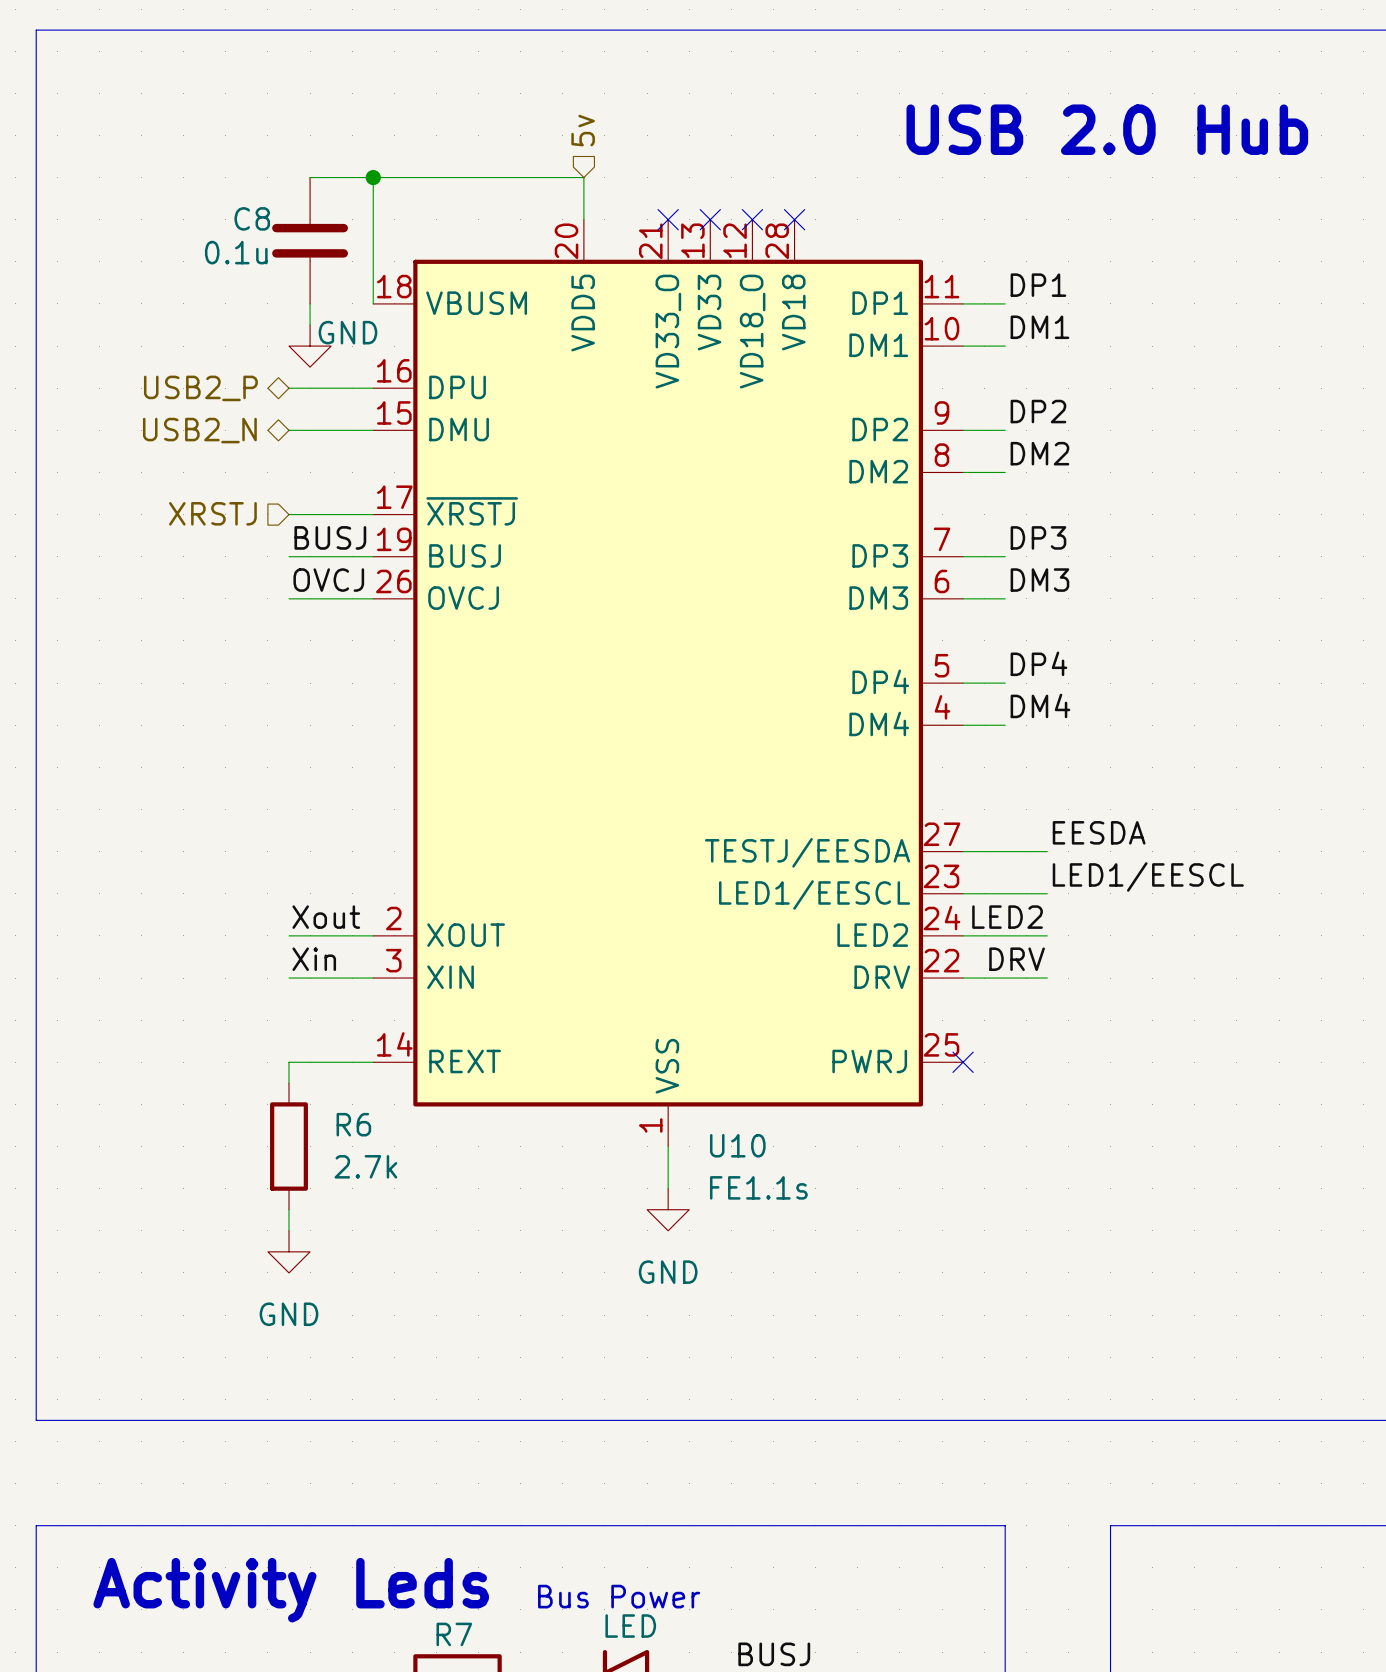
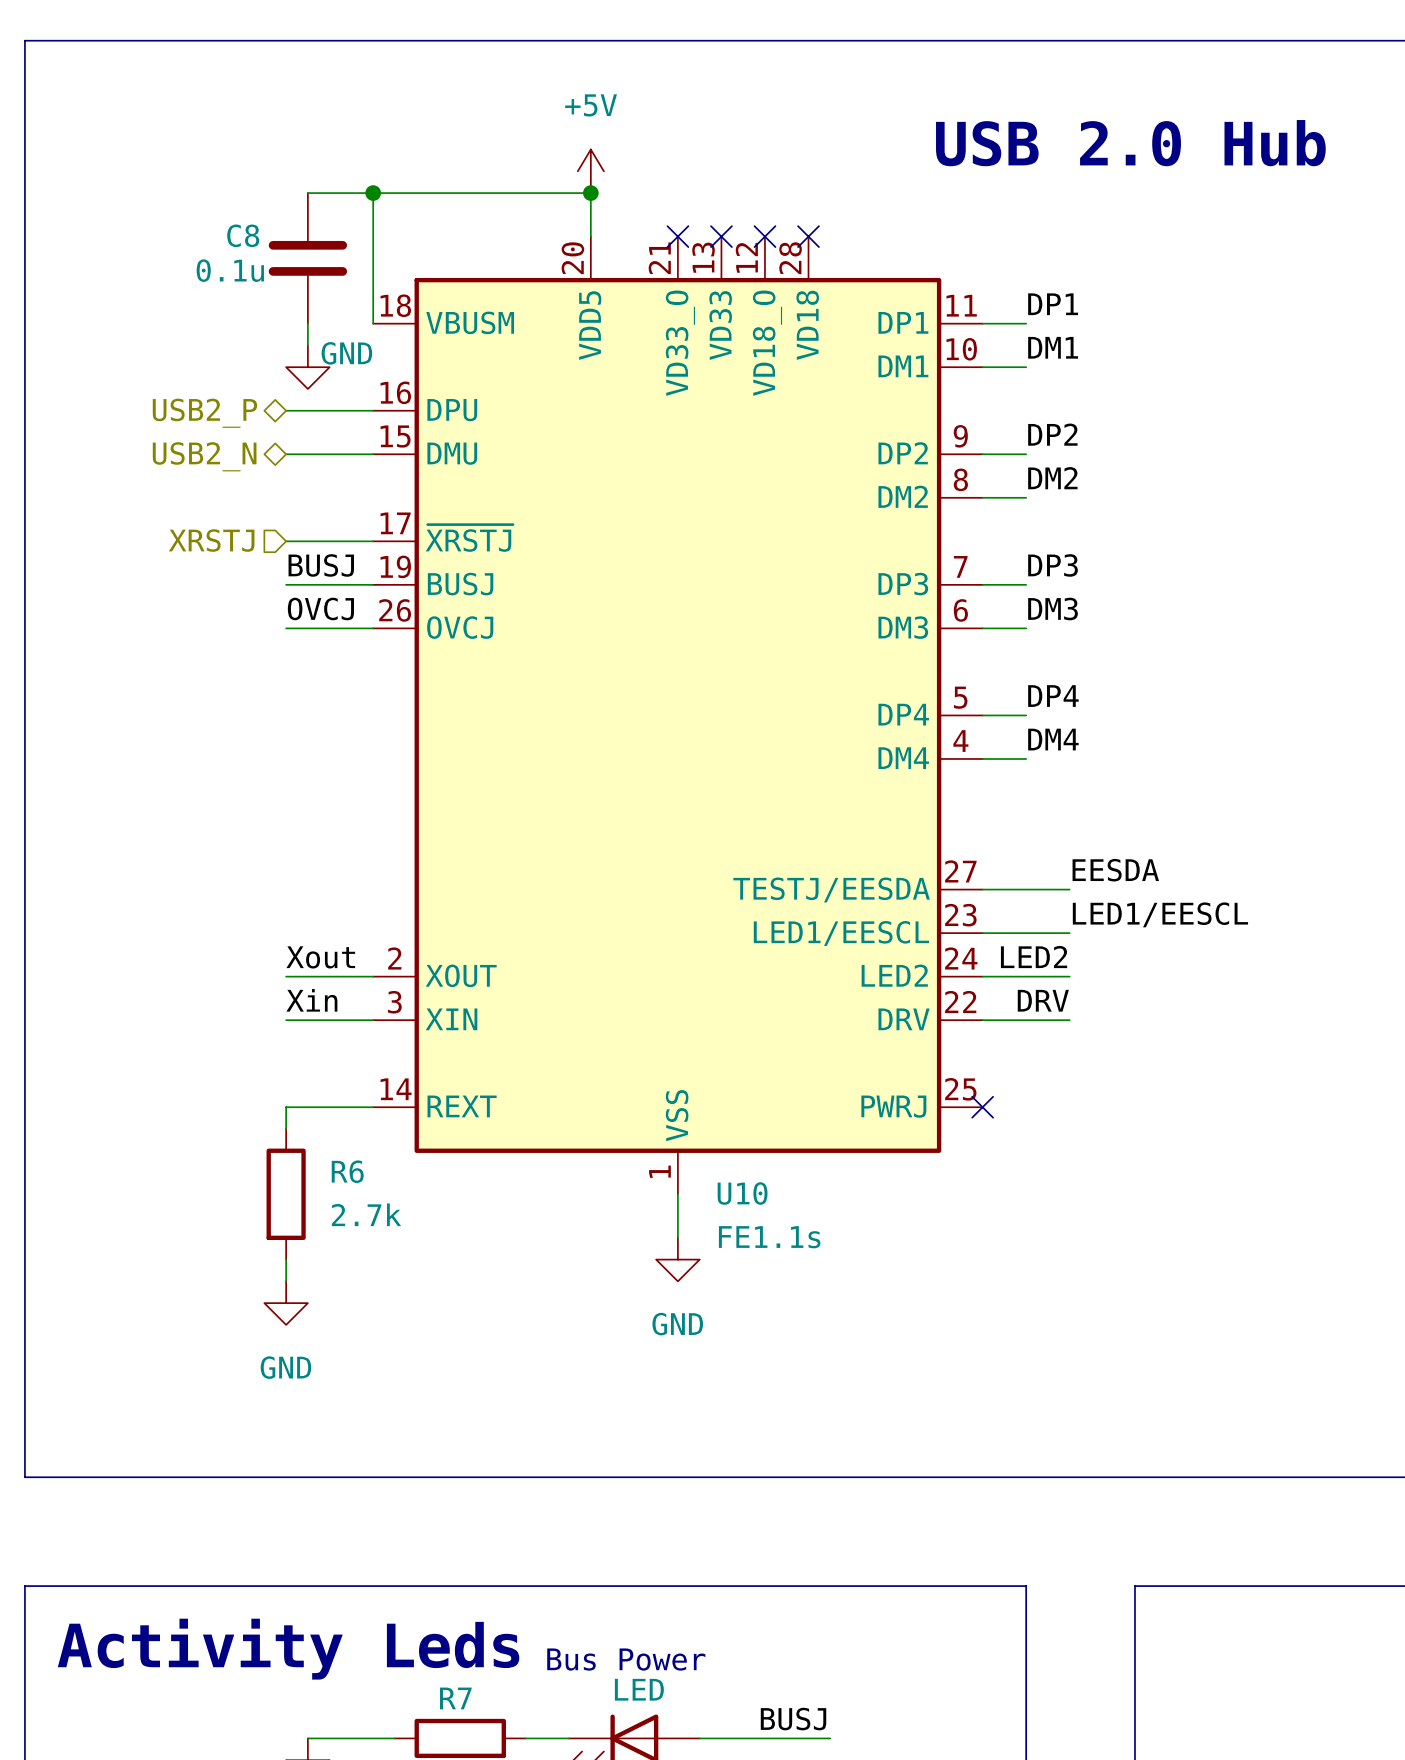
hierarchical label: 5v (583, 130) -> none
power symbol: none -> +5V (590, 171)
junction: none -> (590, 193)

